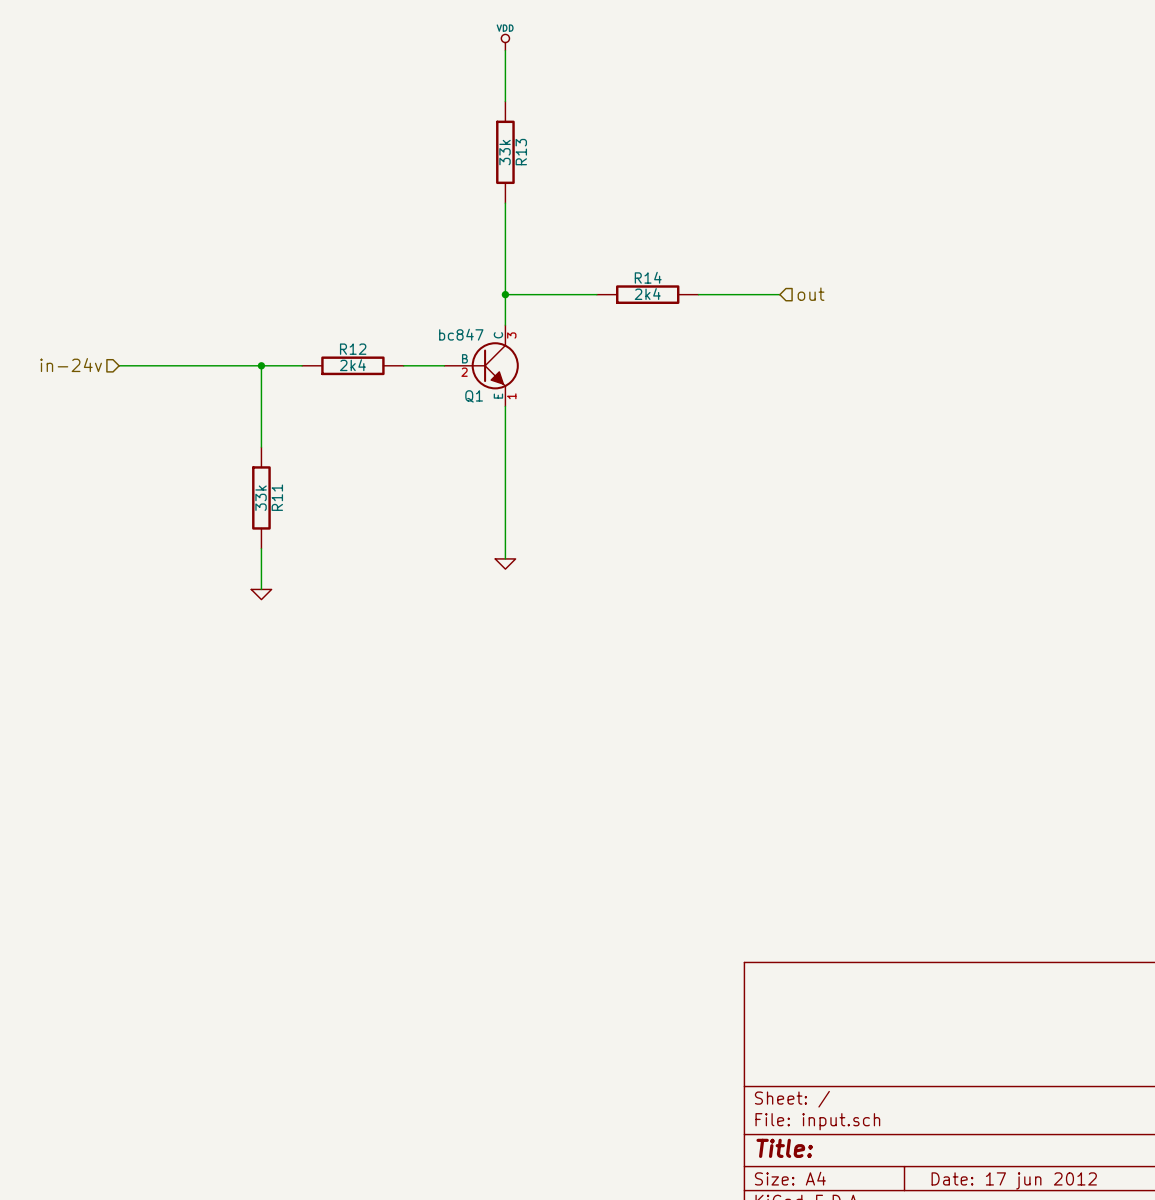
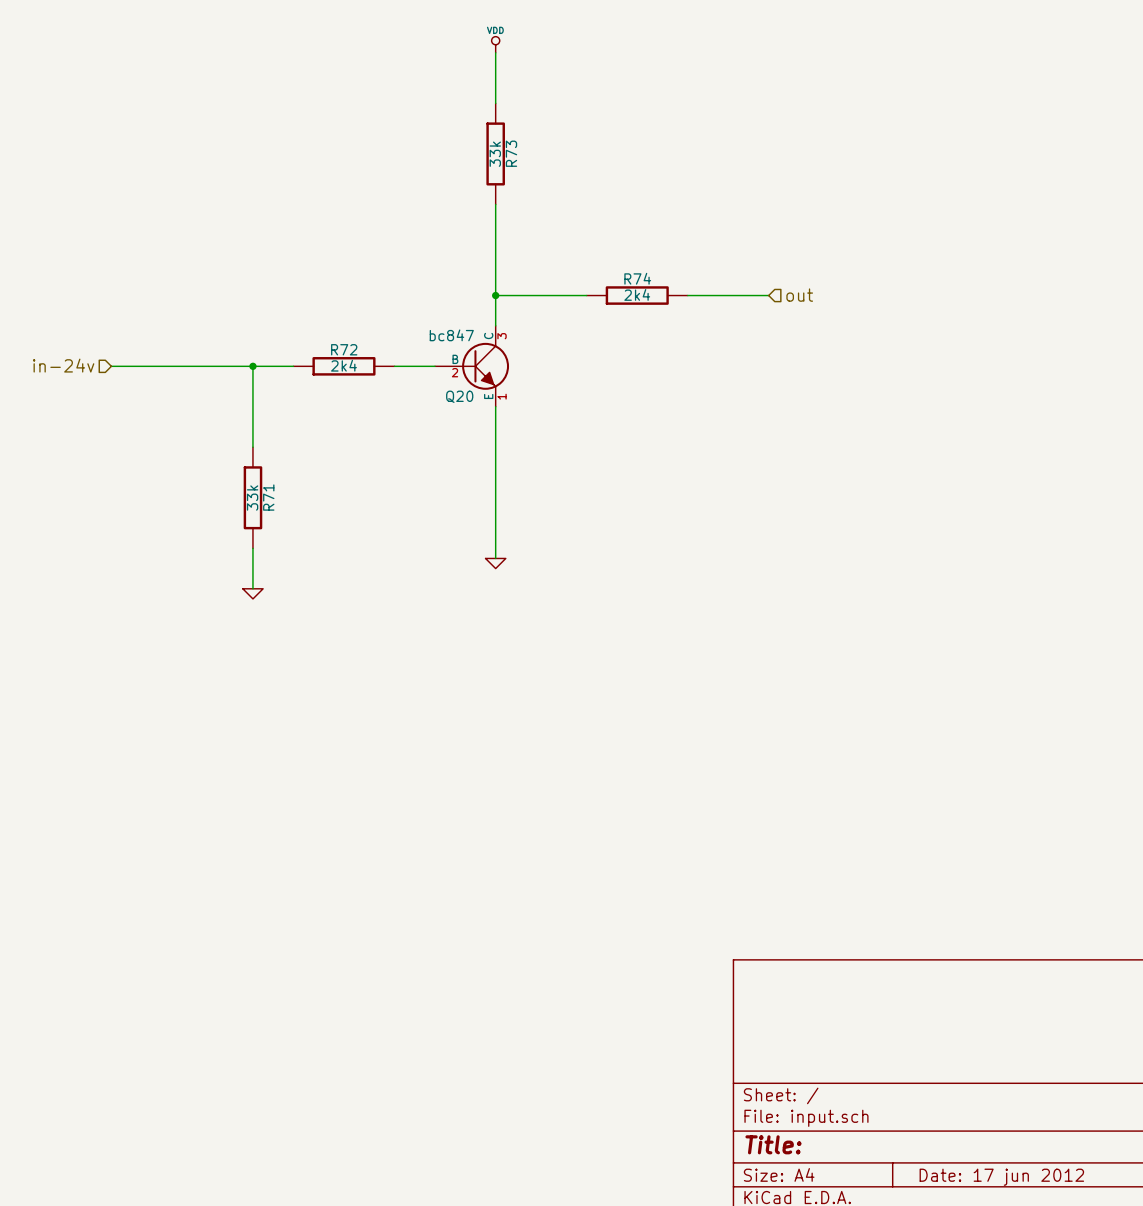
R13 name: R13 (521, 152) -> R73 (511, 153)
R14 name: R14 (648, 277) -> R74 (637, 278)
R12 name: R12 (353, 349) -> R72 (344, 349)
Q1 name: Q1 (474, 396) -> Q20 (459, 396)
R11 name: R11 (277, 497) -> R71 (268, 497)

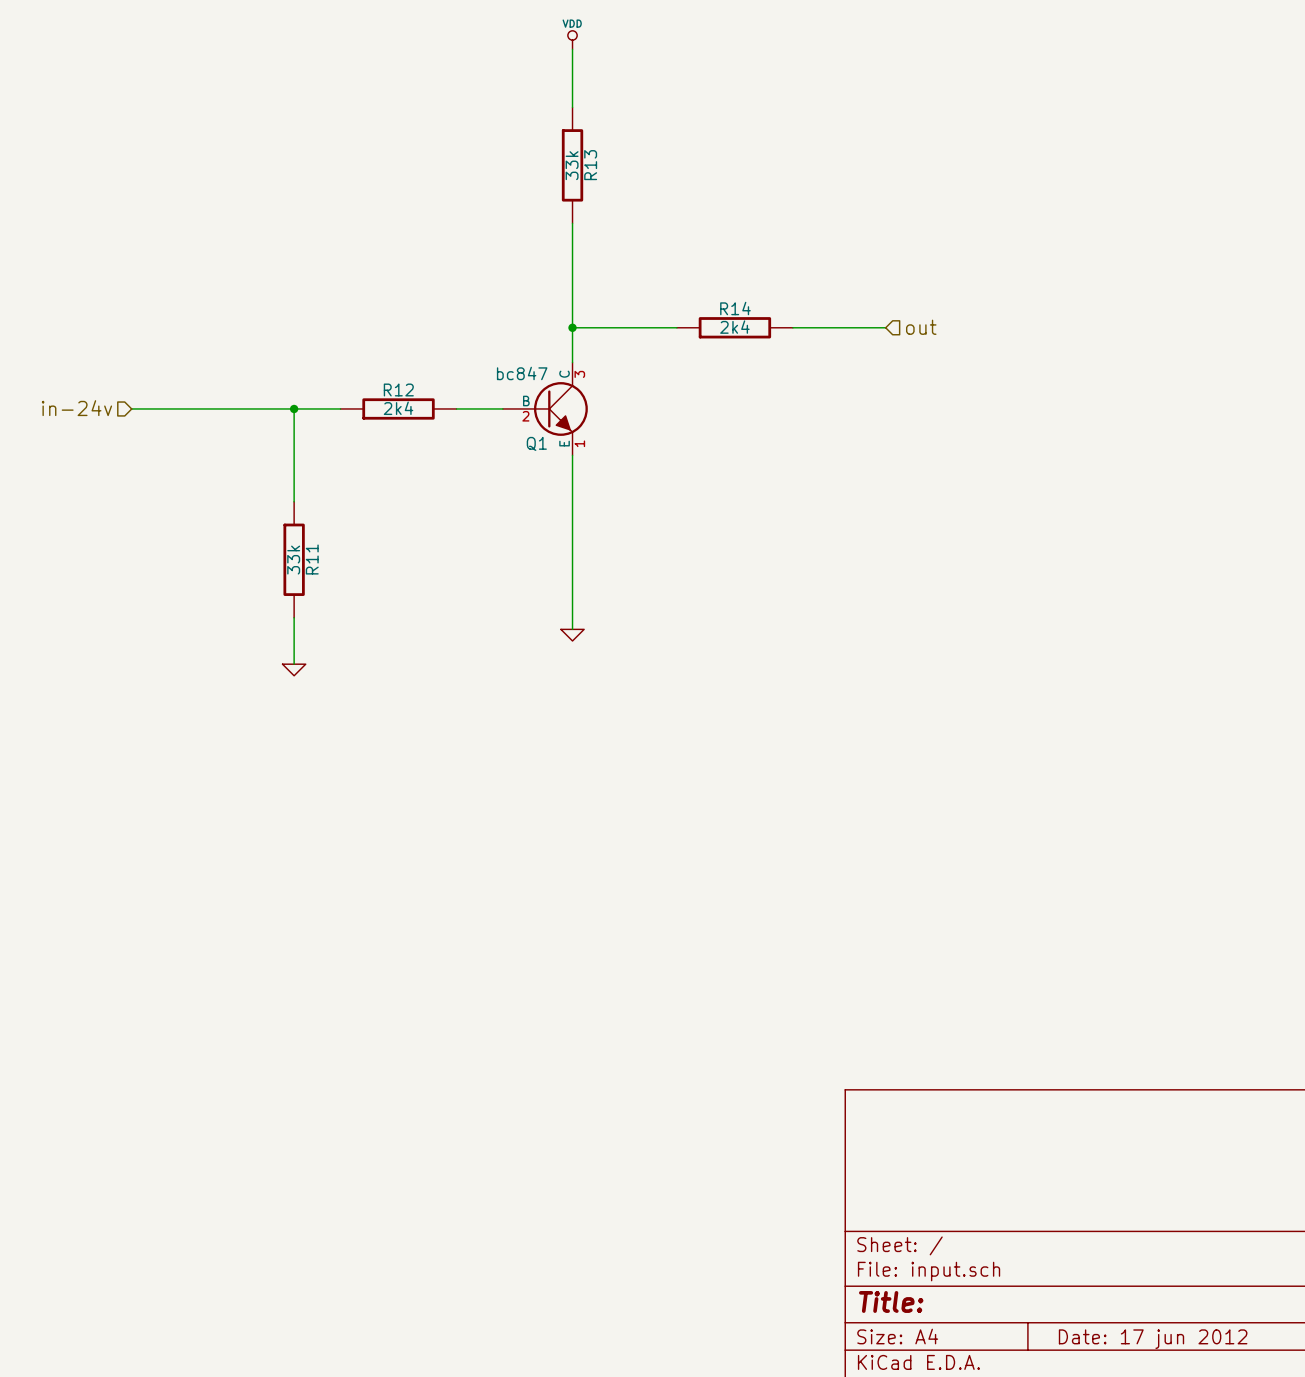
R73 name: R73 (511, 153) -> R13 (590, 165)
R74 name: R74 (637, 278) -> R14 (735, 308)
R72 name: R72 (344, 349) -> R12 (398, 389)
Q20 name: Q20 (459, 396) -> Q1 (536, 443)
R71 name: R71 (268, 497) -> R11 (312, 559)

